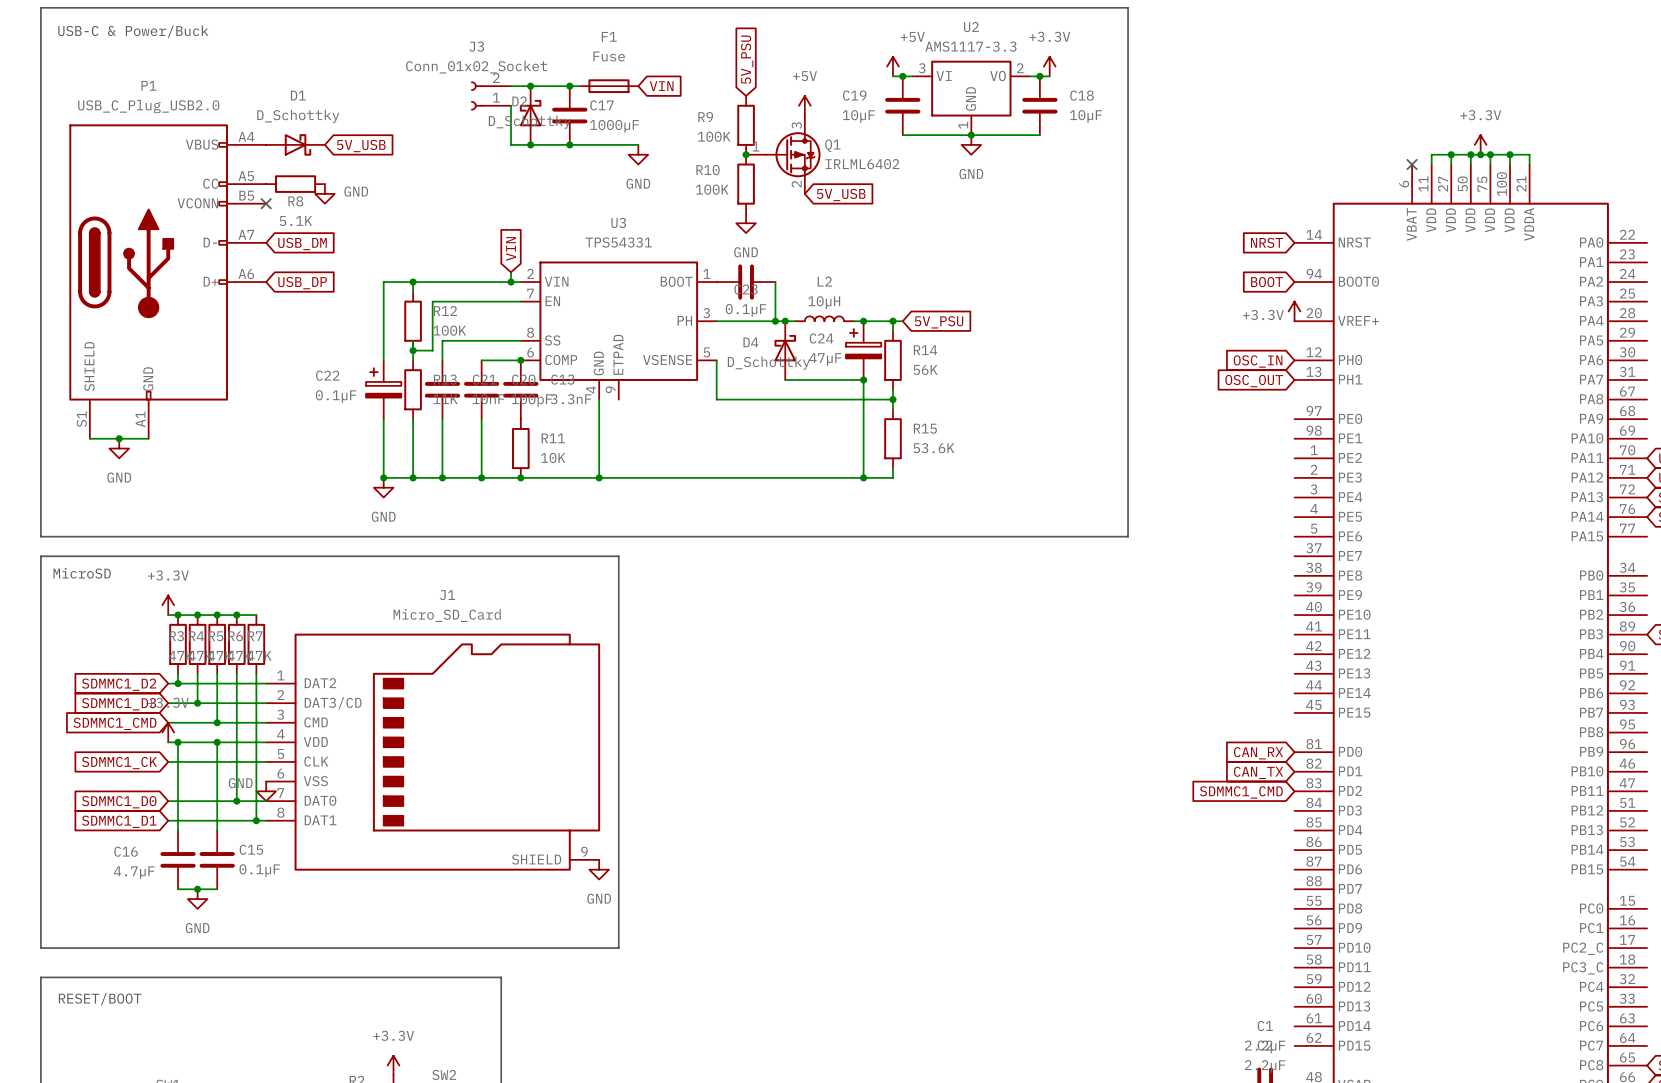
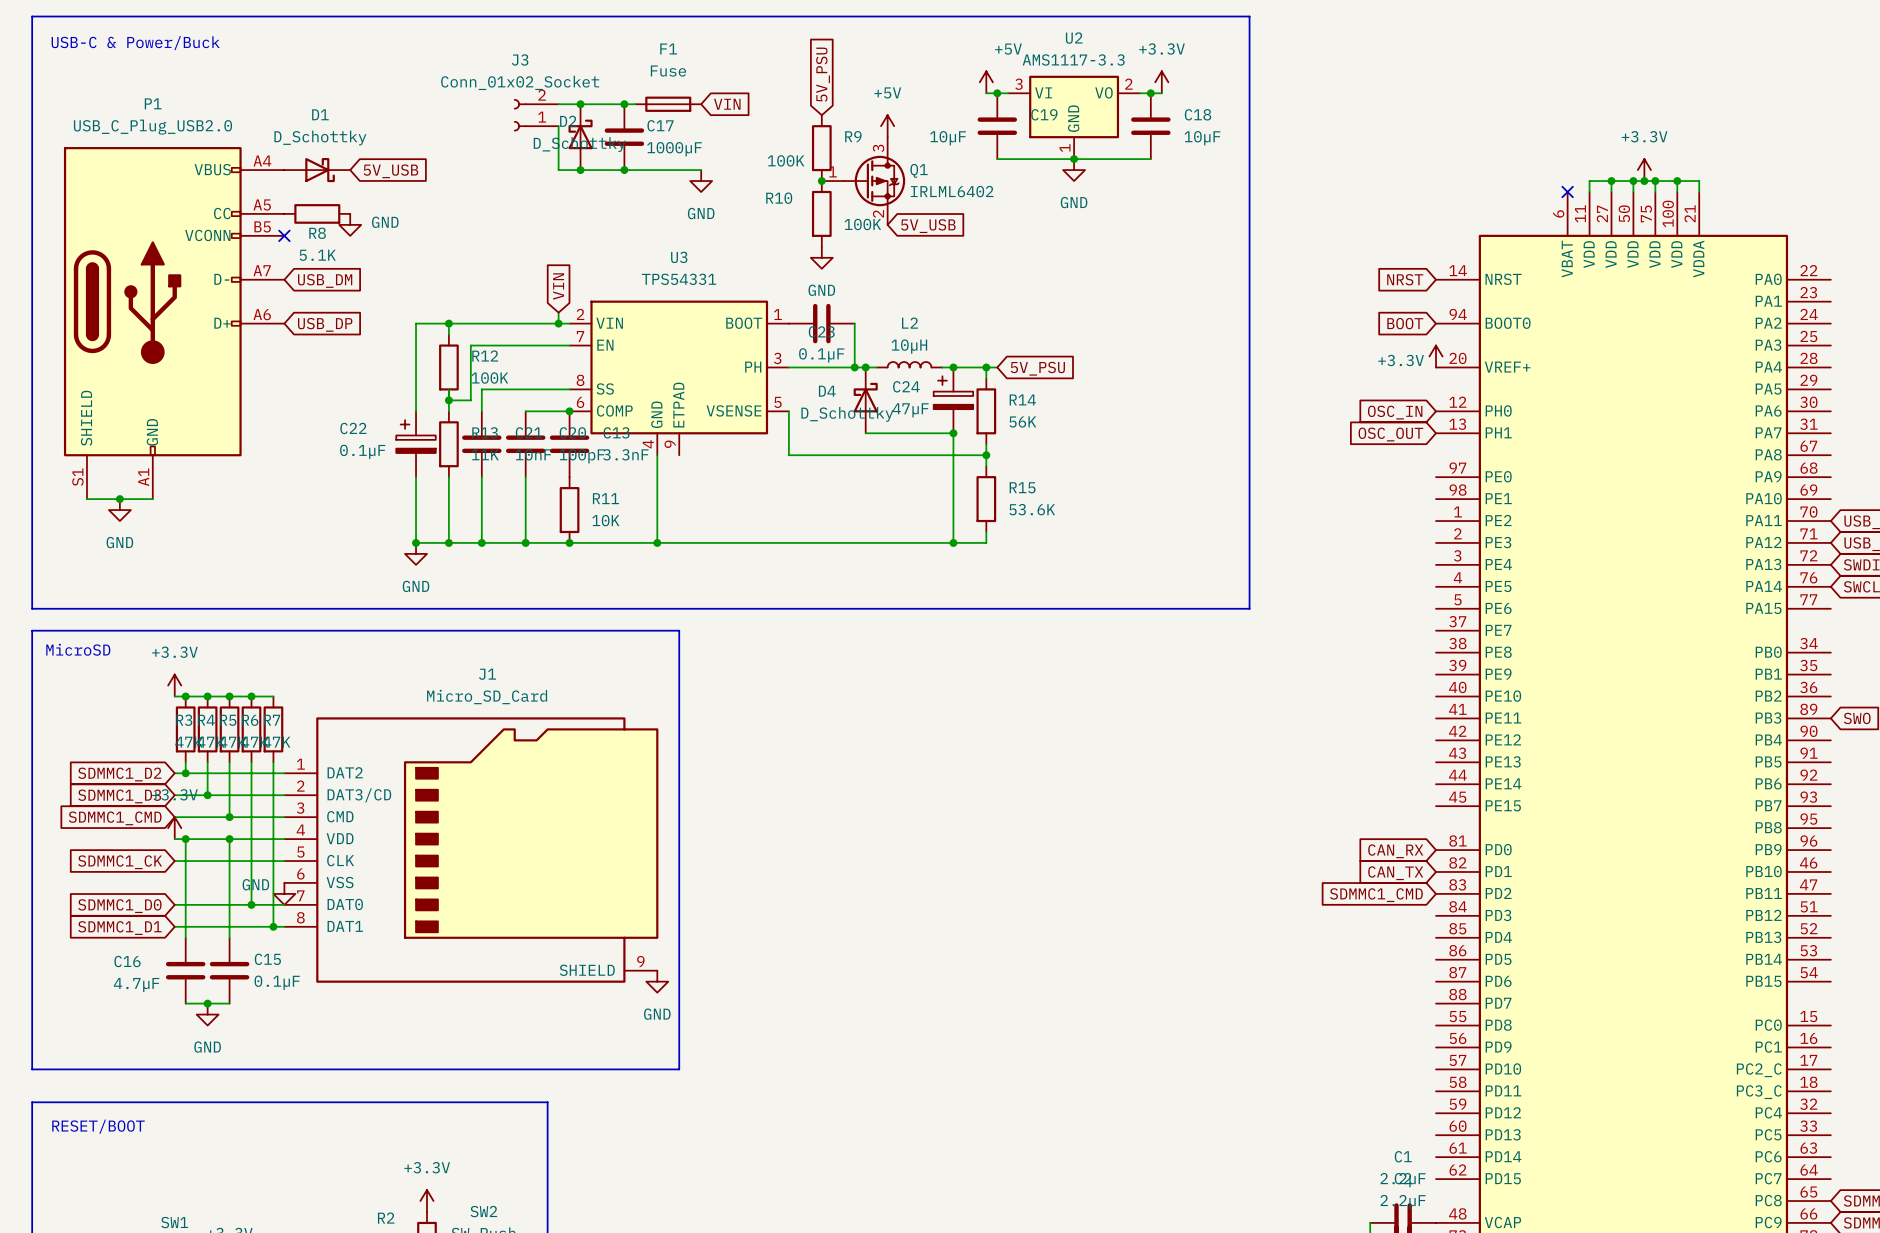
C19 name position: C19 (854, 95) -> C19 (1044, 114)
R9 name position: R9 (705, 117) -> R9 (853, 136)
R10 value position: 100K (712, 189) -> 100K (862, 224)

